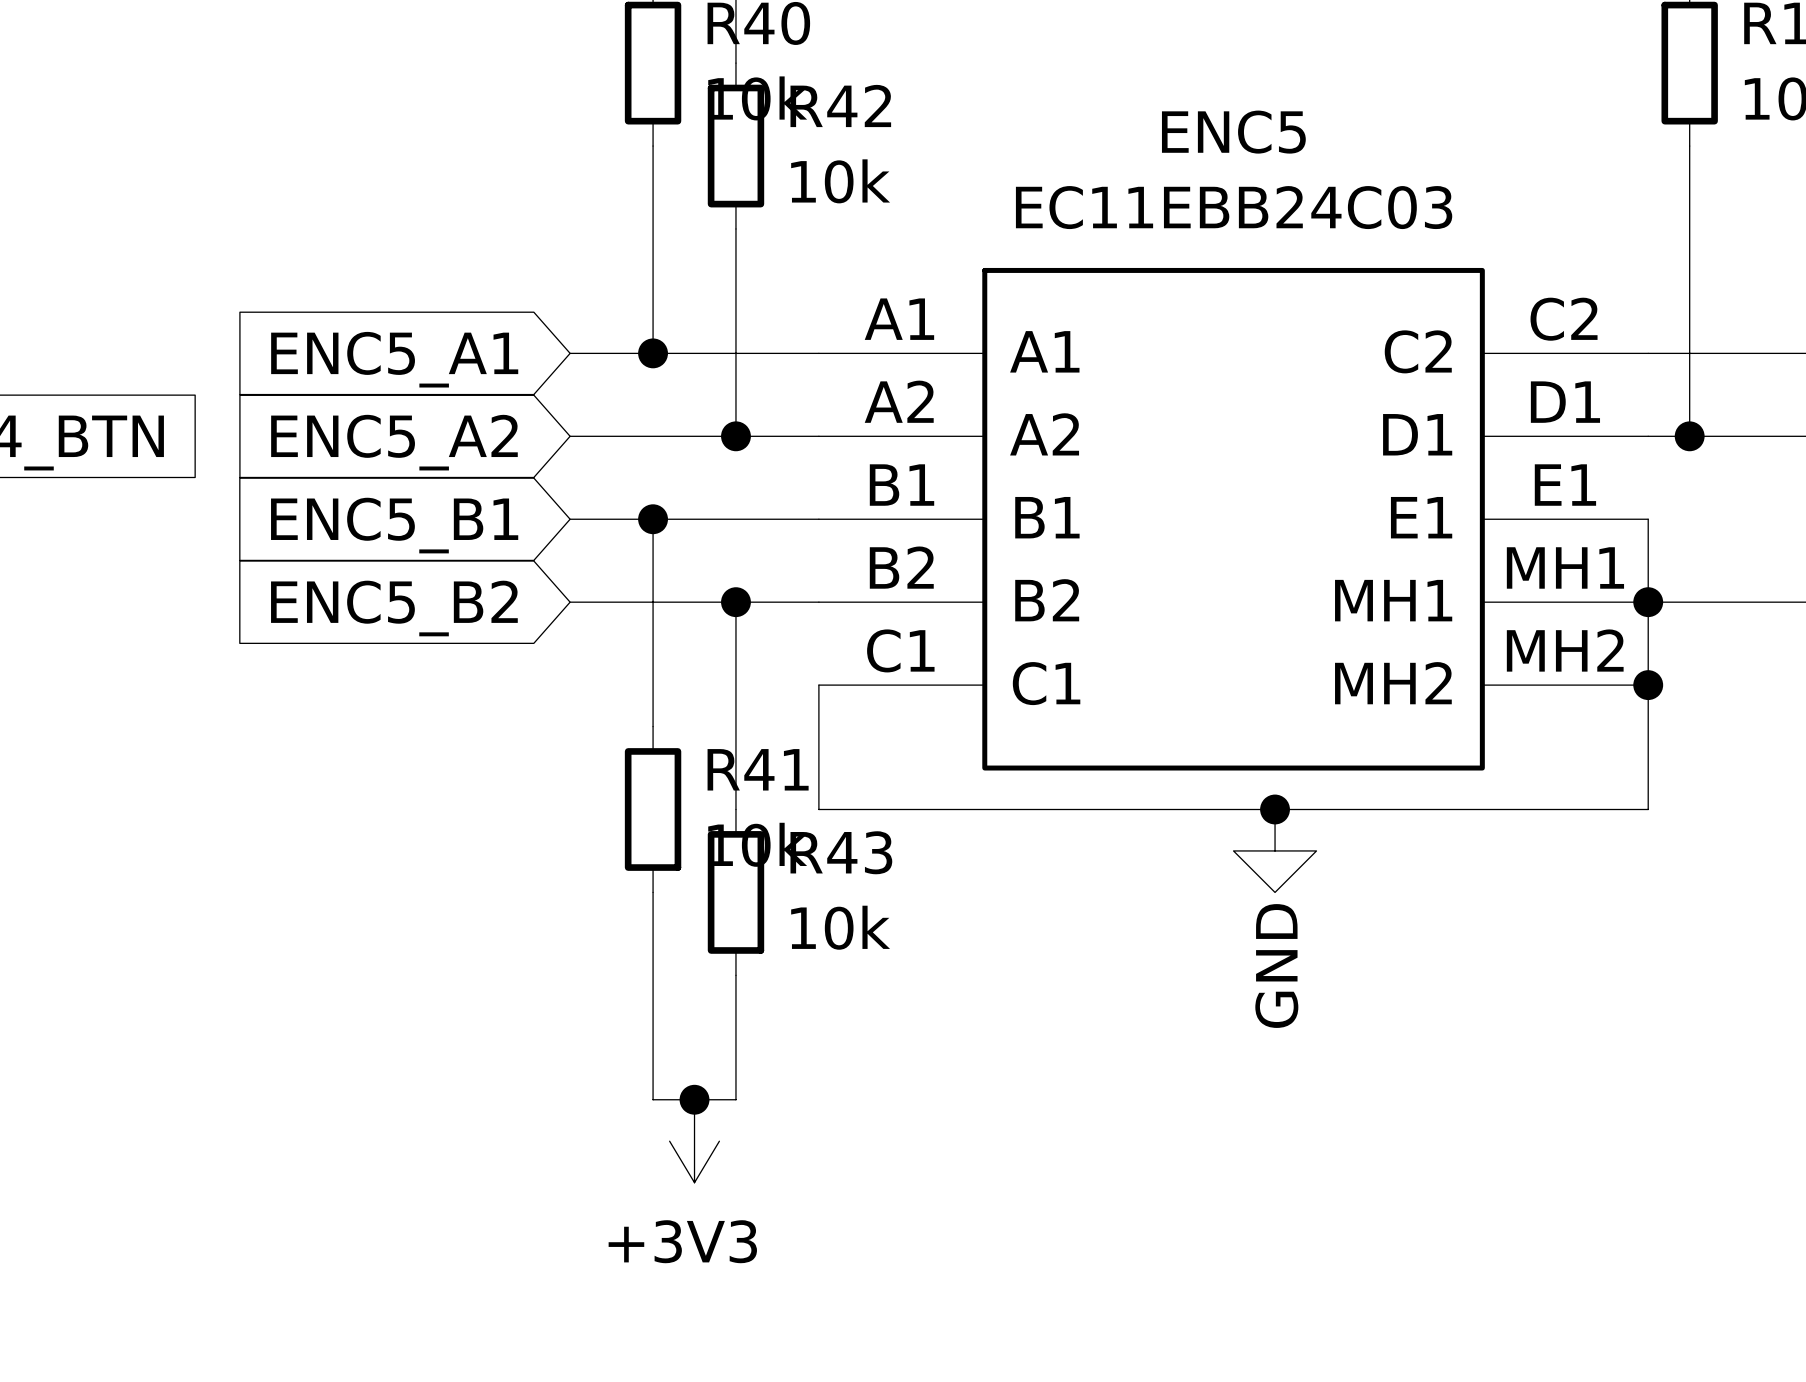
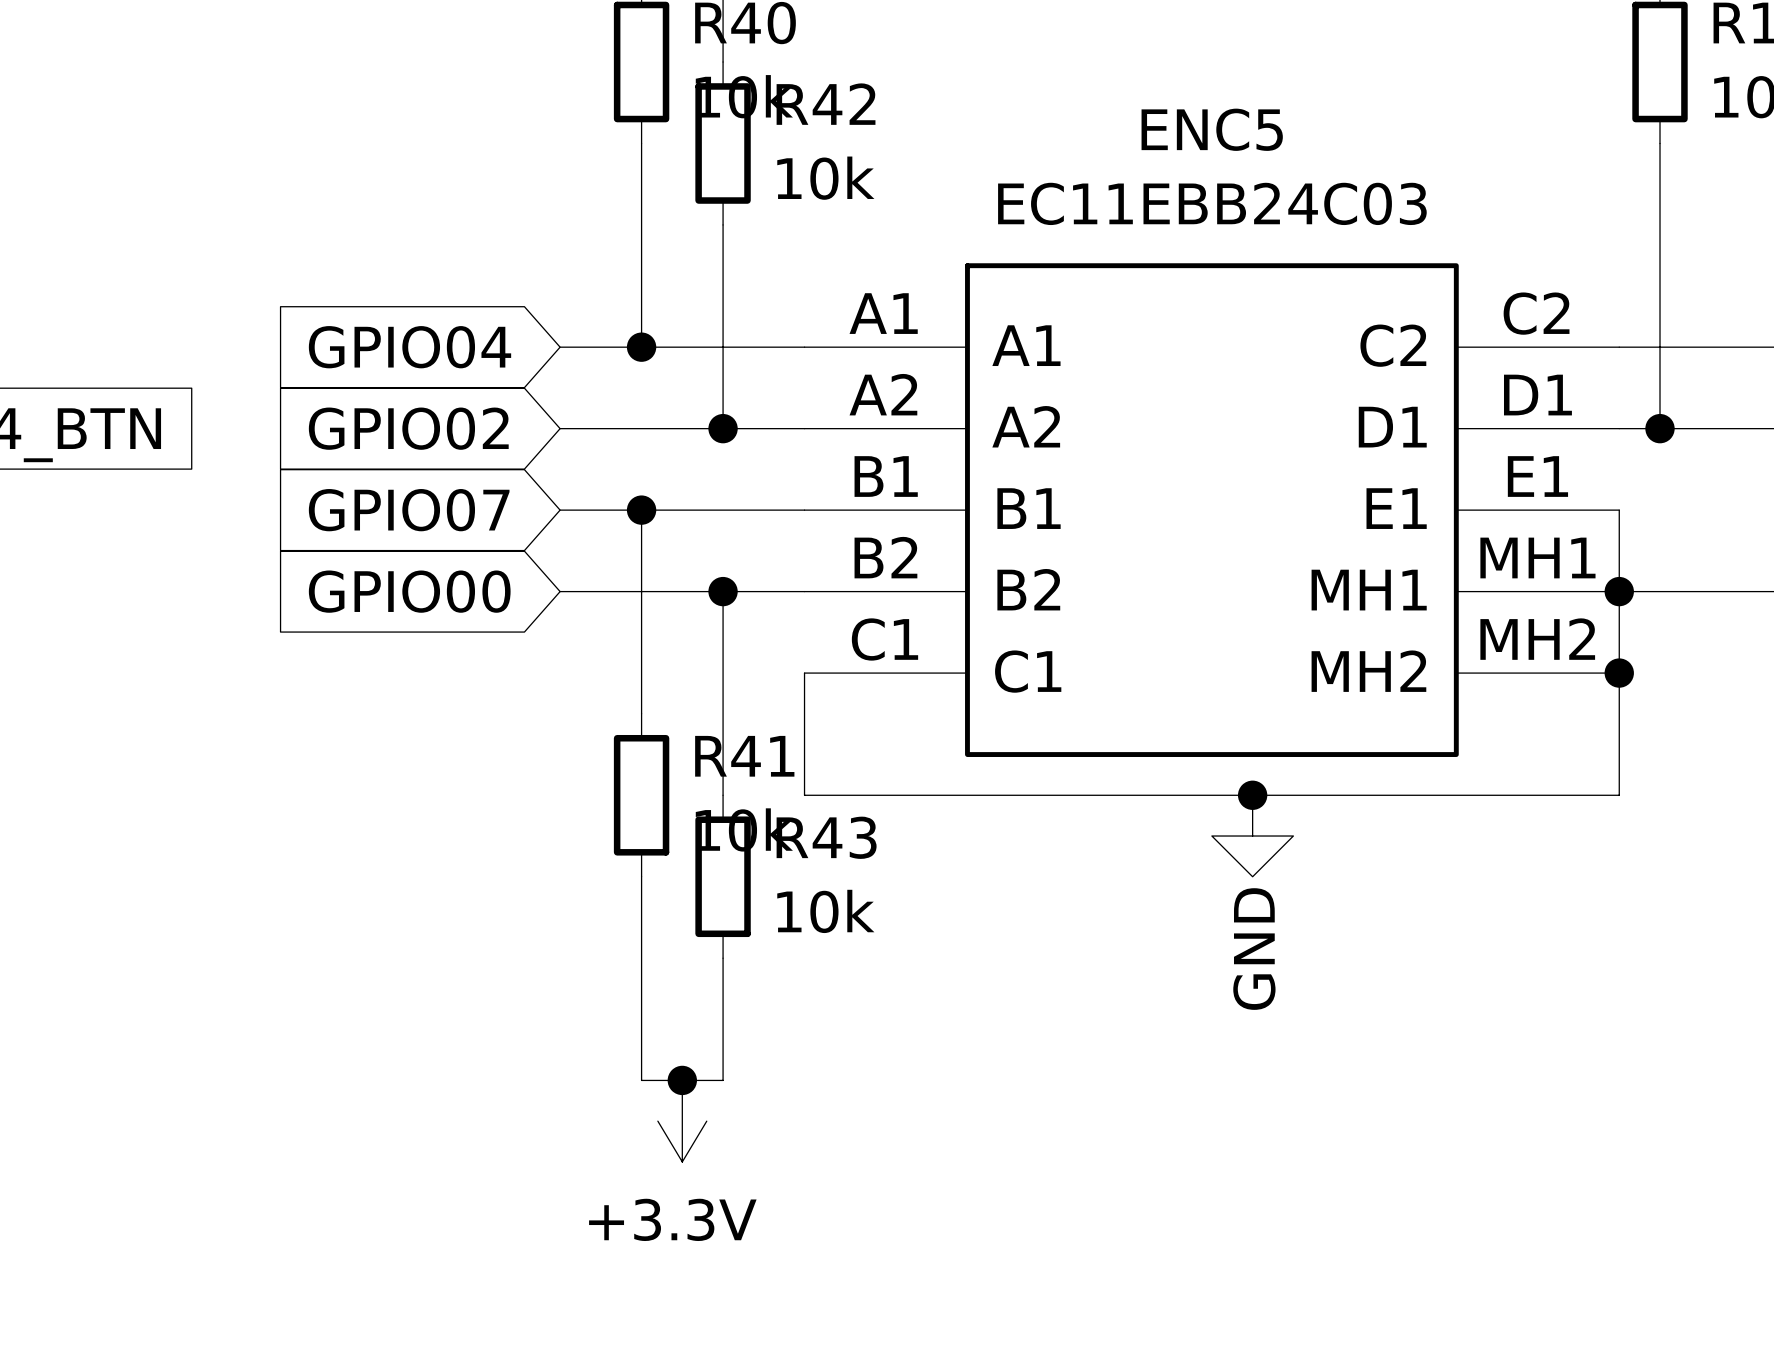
global label: ENC5_A1 (394, 359) -> GPIO04 (410, 347)
global label: ENC5_A2 (394, 442) -> GPIO02 (408, 428)
global label: ENC5_B1 (394, 525) -> GPIO07 (409, 510)
global label: ENC5_B2 (394, 608) -> GPIO00 (409, 591)
power symbol: +3V3 (694, 1141) -> +3.3V (682, 1121)

